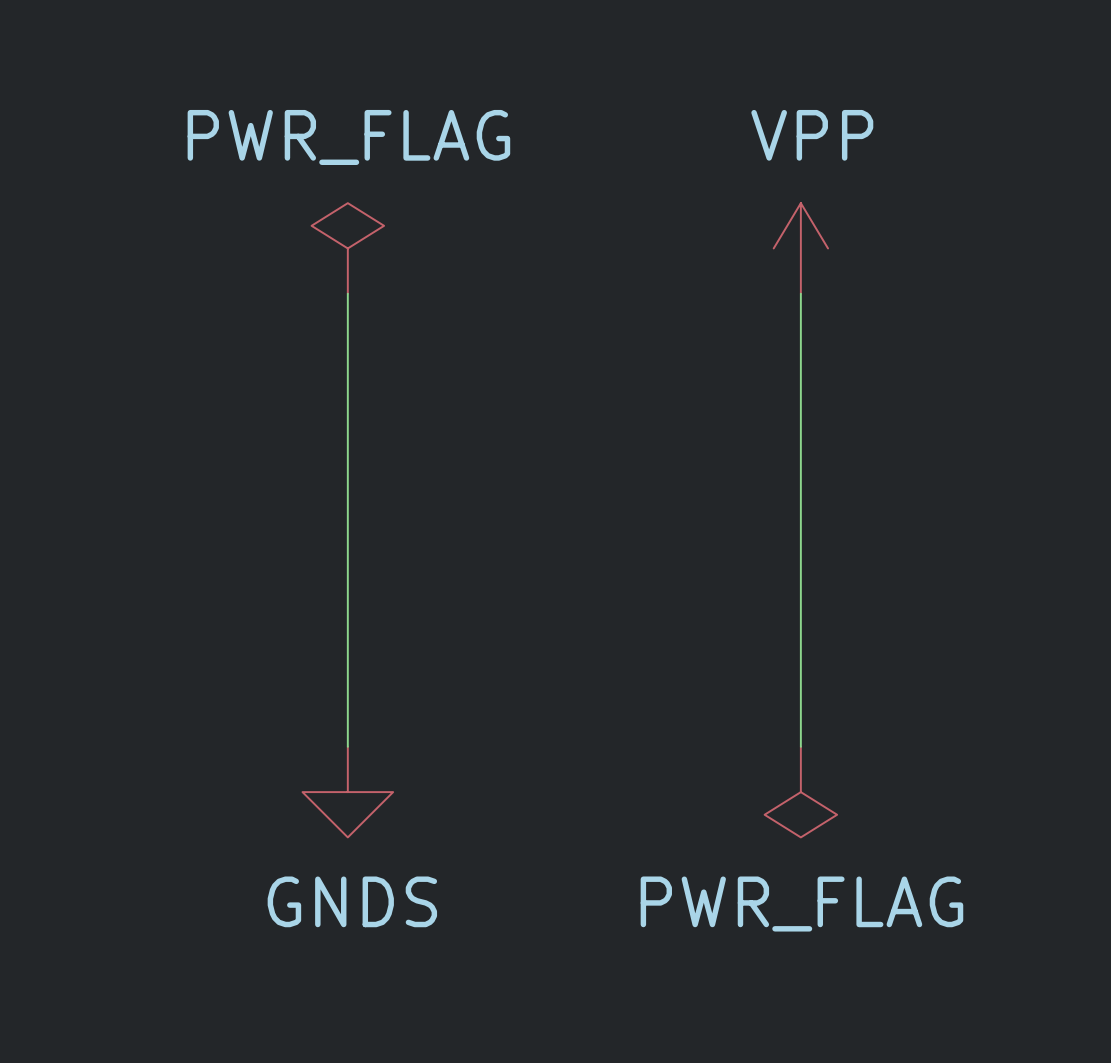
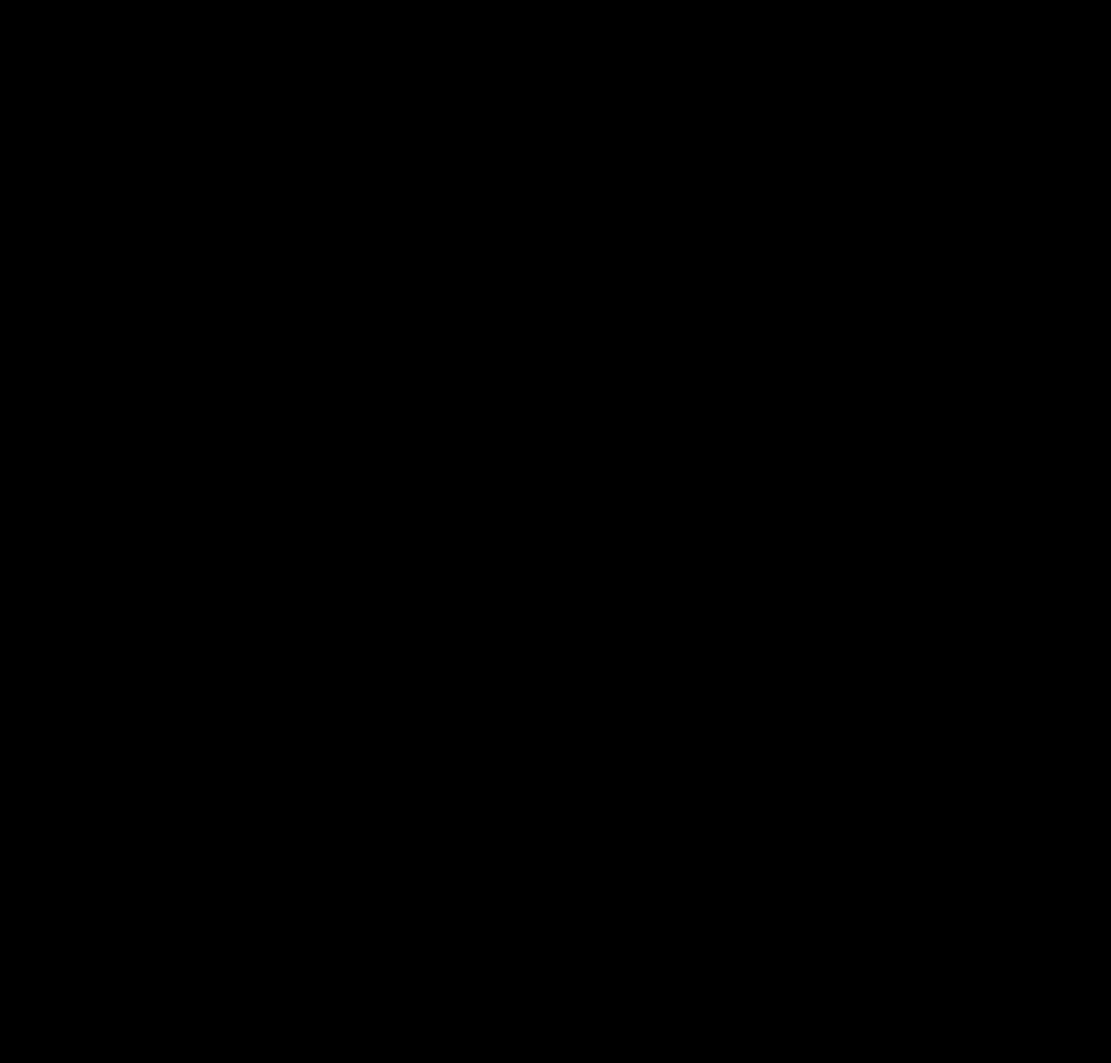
power symbol: PWR_FLAG (347, 248) -> none
power symbol: VPP (800, 248) -> none
wire: (347, 293) (347, 746) -> none
wire: (800, 293) (800, 746) -> none
power symbol: GNDS (347, 792) -> none
power symbol: PWR_FLAG (800, 792) -> none

